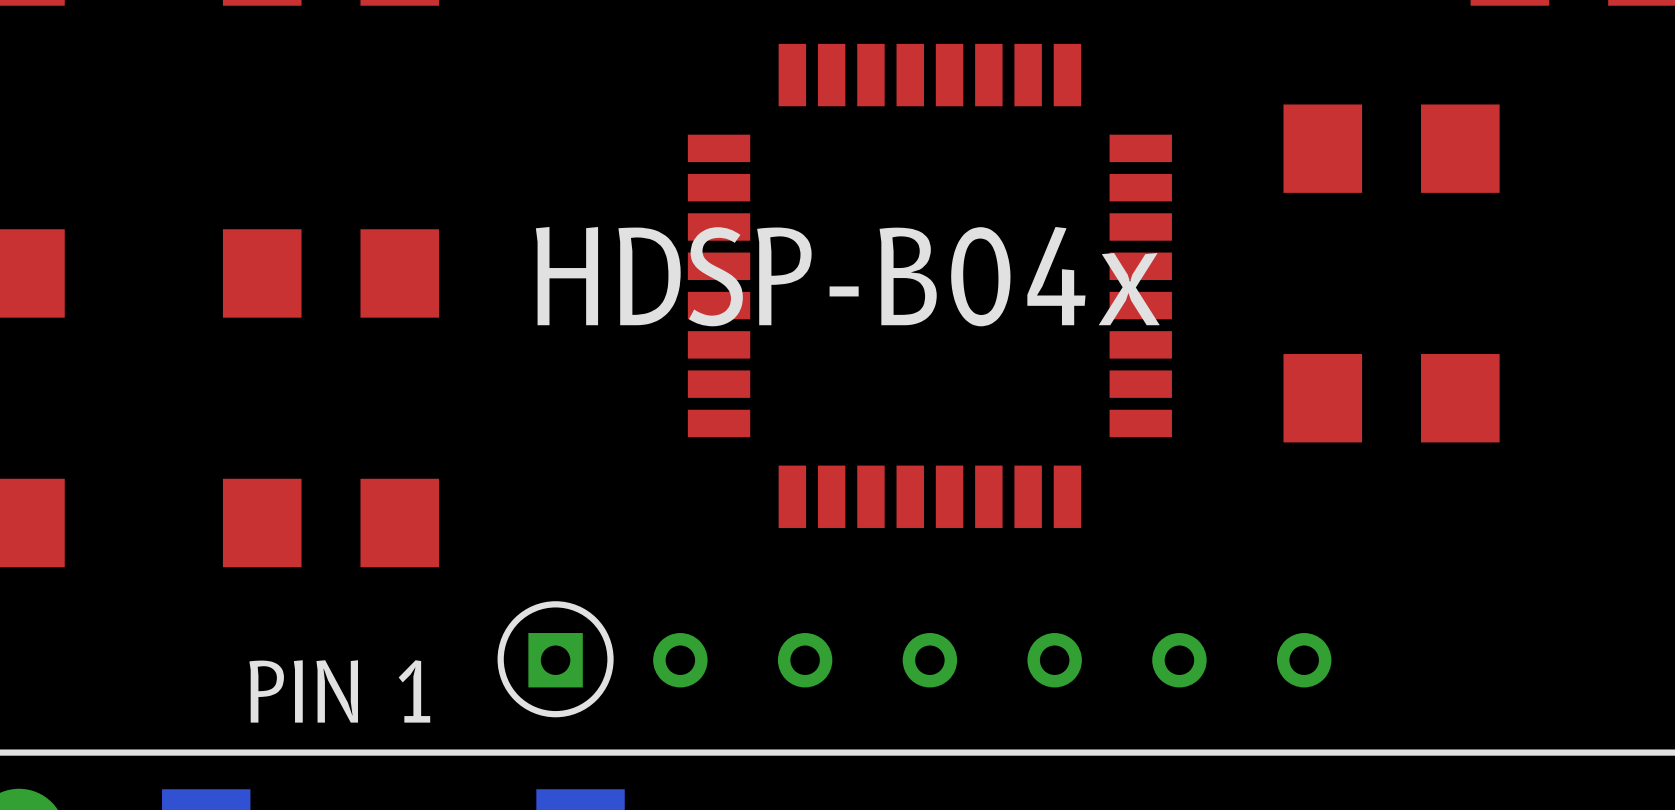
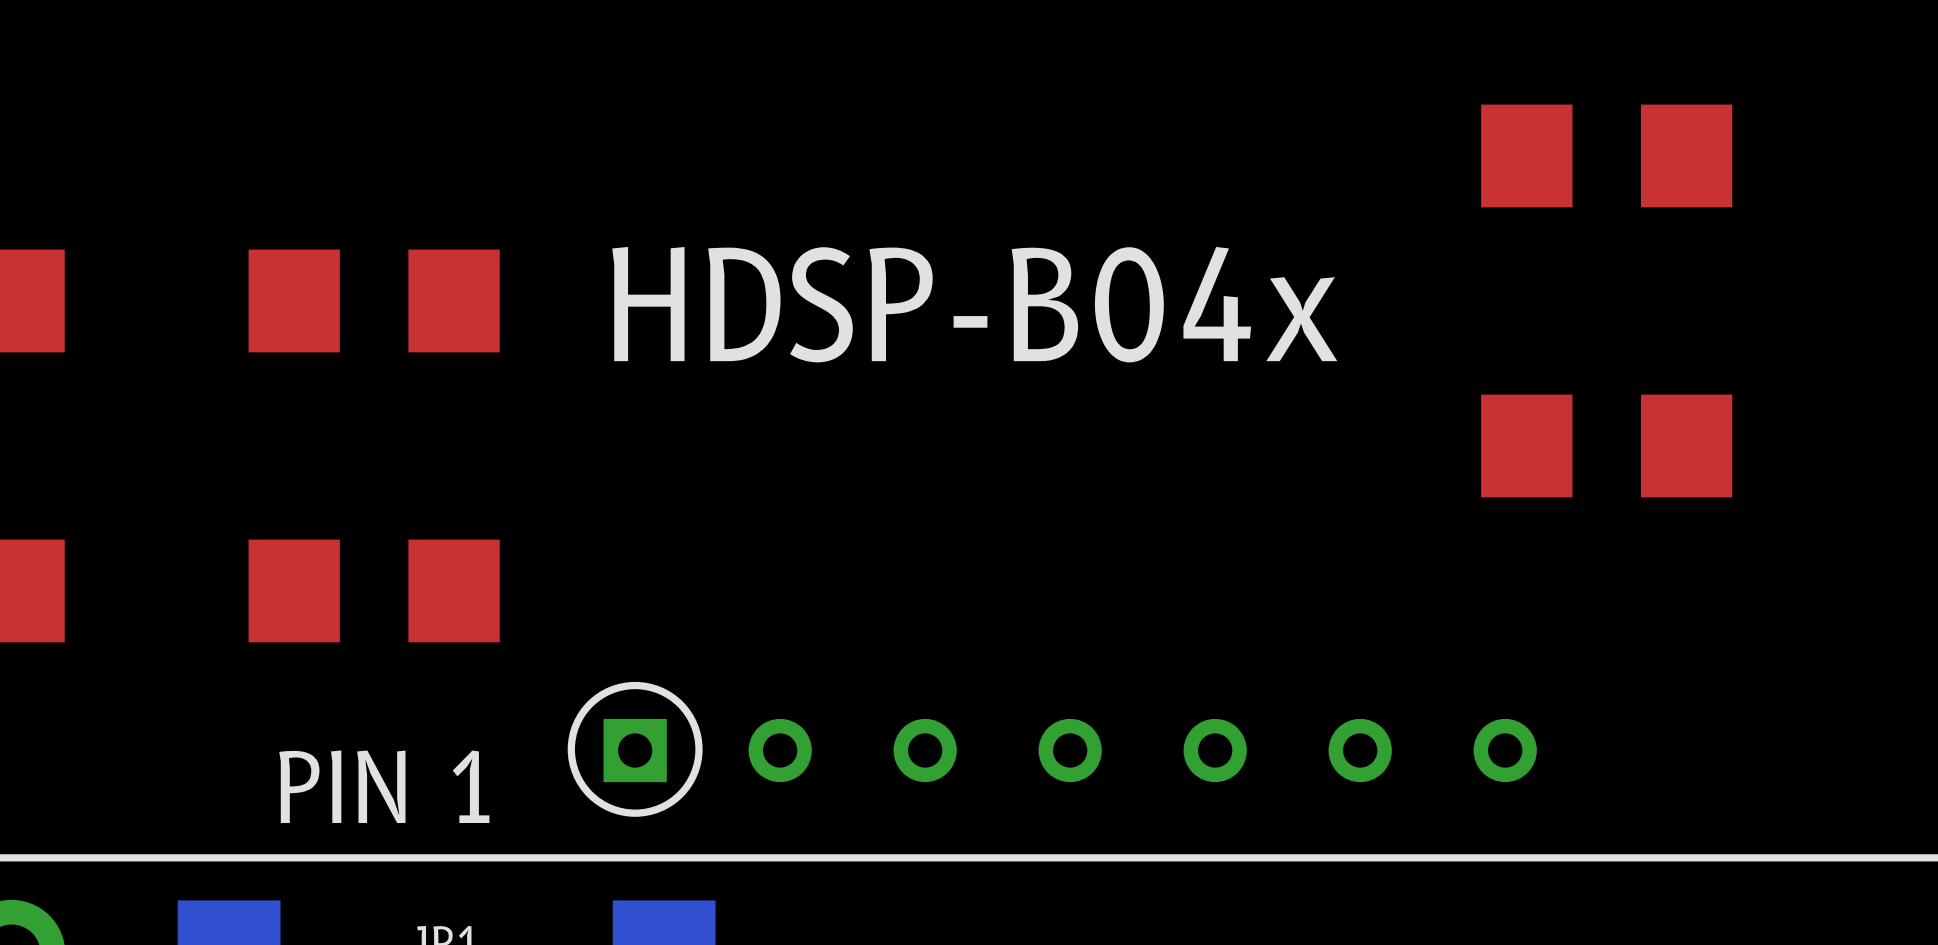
part: (929, 285) -> none

